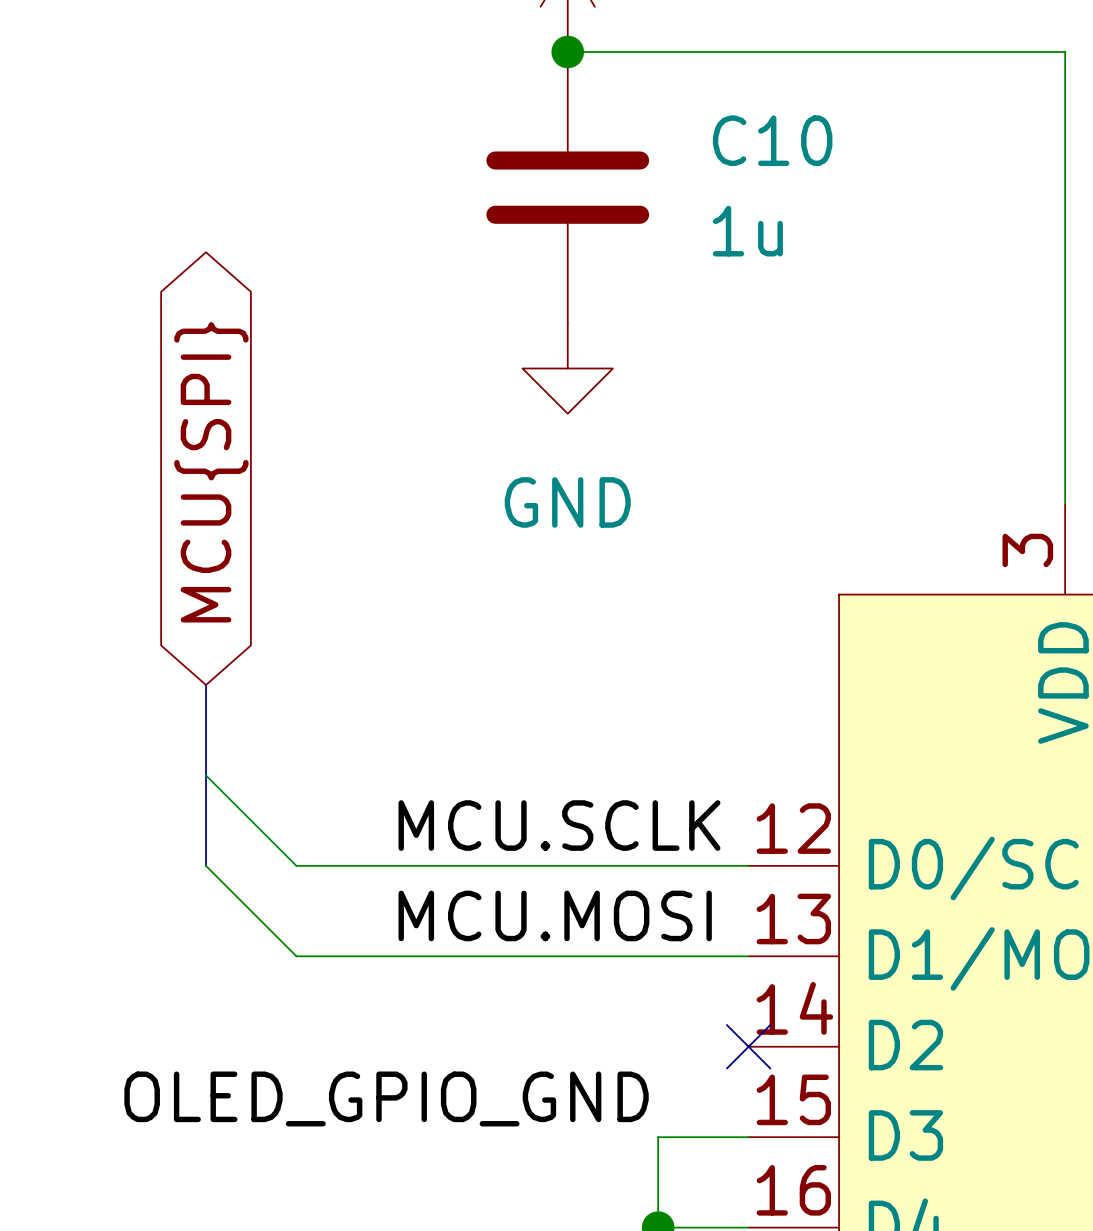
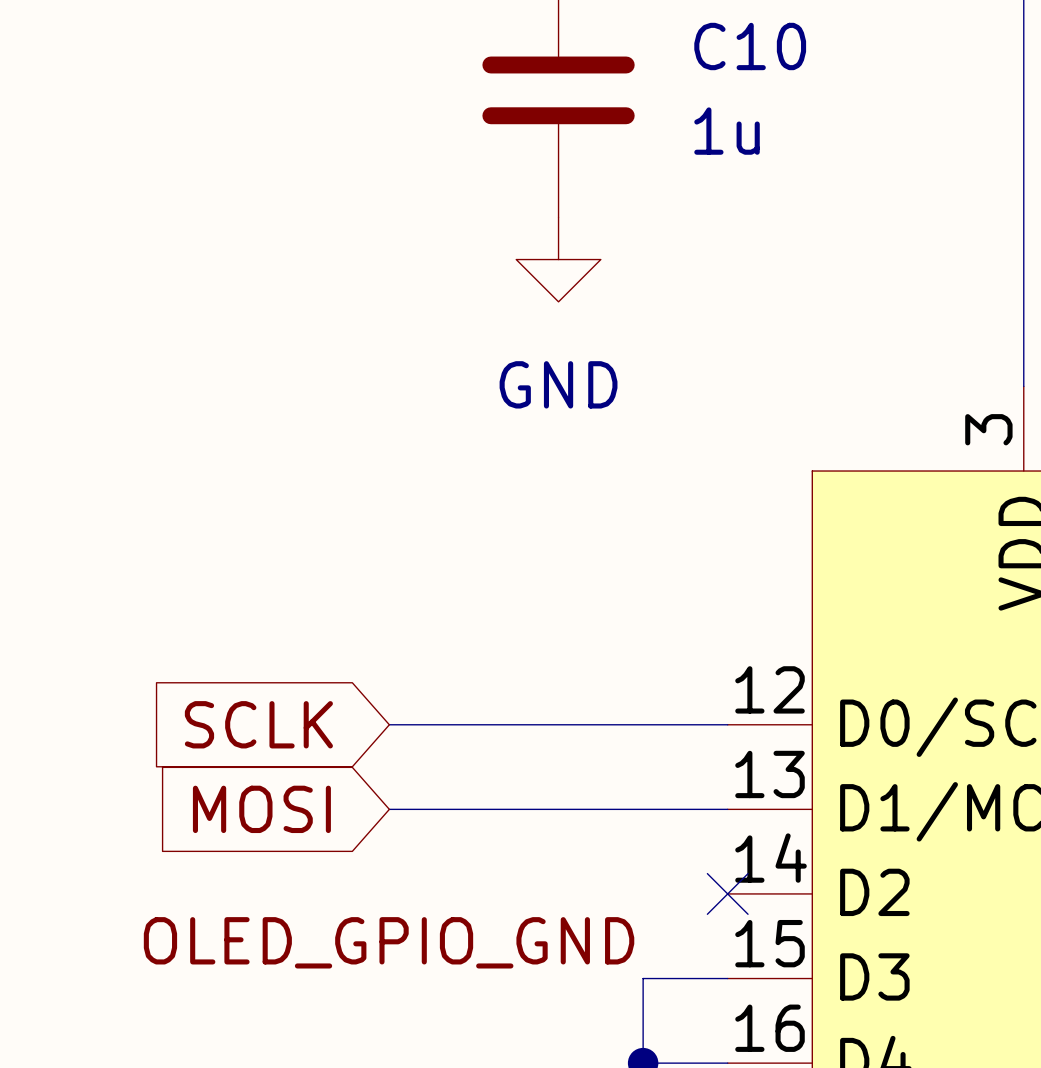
global label: MCU{SPI} (211, 472) -> none
bus: (206, 685) (206, 865) -> none
wire: (206, 775) (296, 865) (386, 865) -> none
label: MCU.SCLK (559, 825) -> none
wire: (206, 865) (296, 956) (386, 956) -> none
global label: none -> SCLK (258, 724)
label: MCU.MOSI (555, 915) -> none
global label: none -> MOSI (261, 809)

